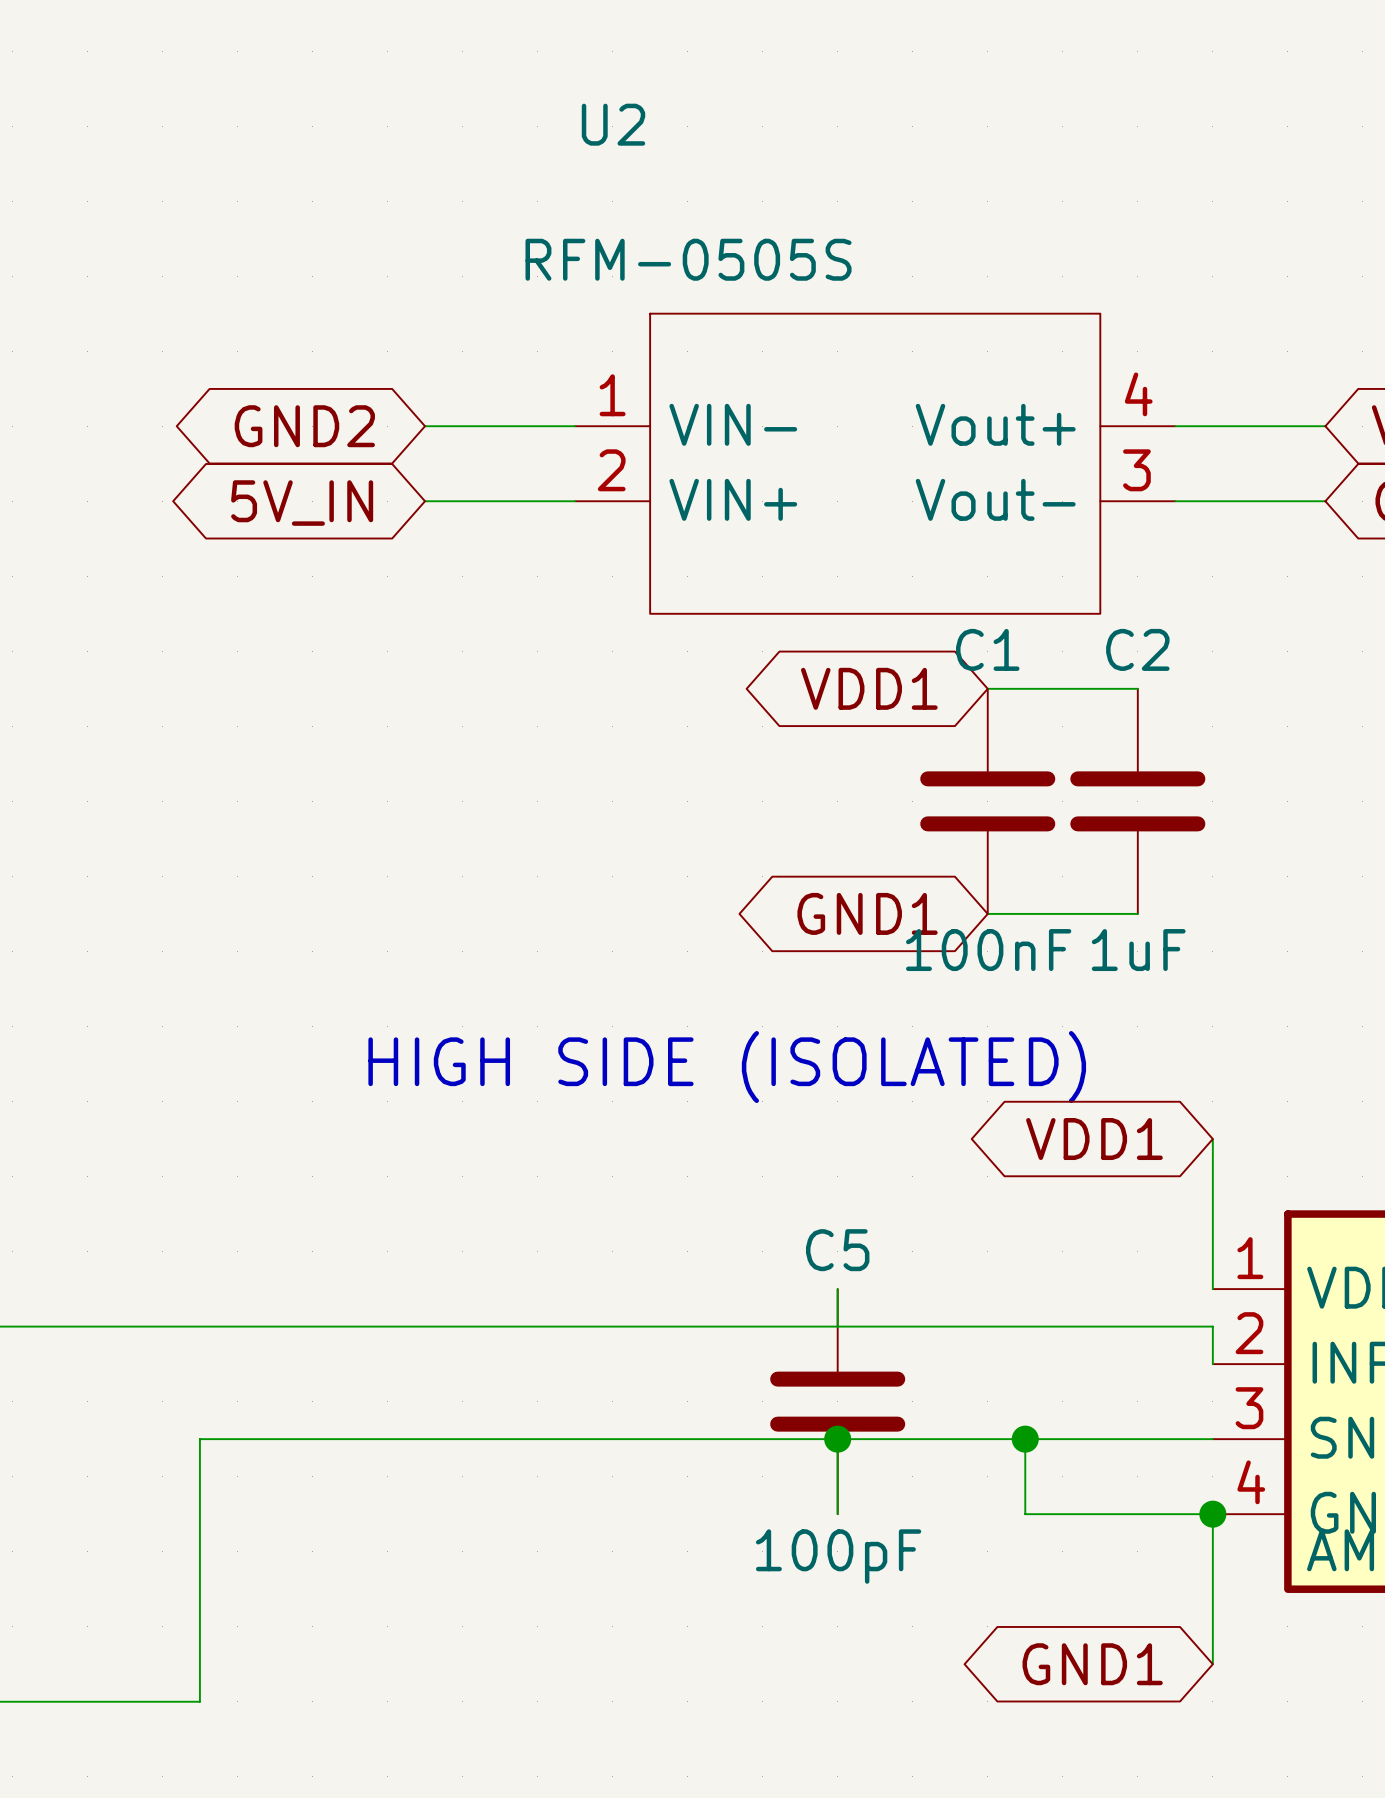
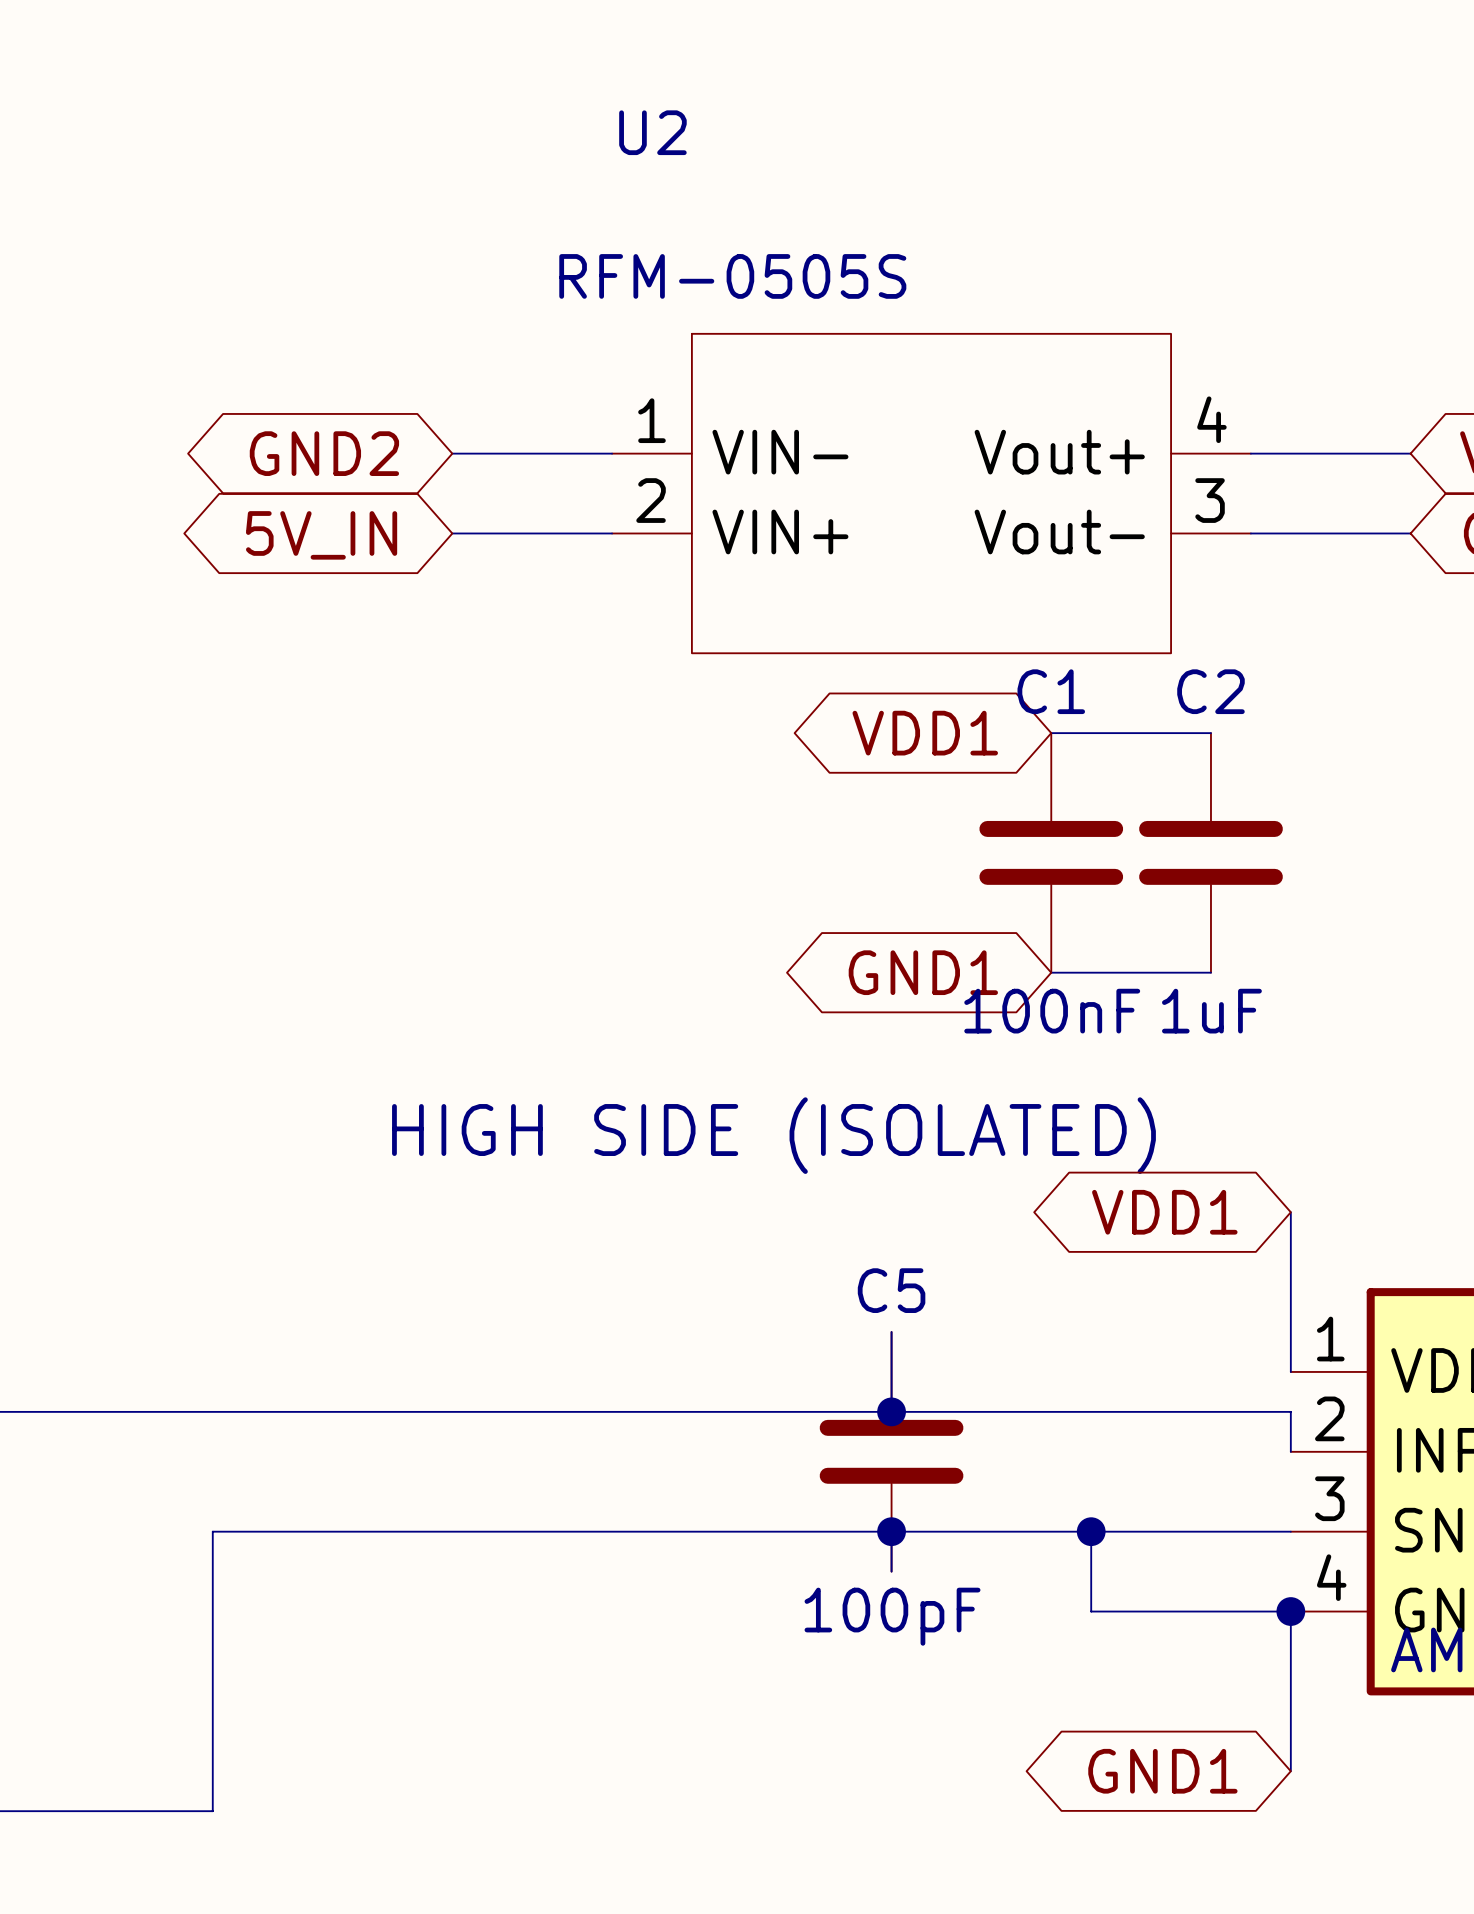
junction: none -> (891, 1411)
C5 position: (837, 1401) -> (891, 1451)
wire: (837, 1476) (837, 1514) -> (891, 1332) (891, 1371)

